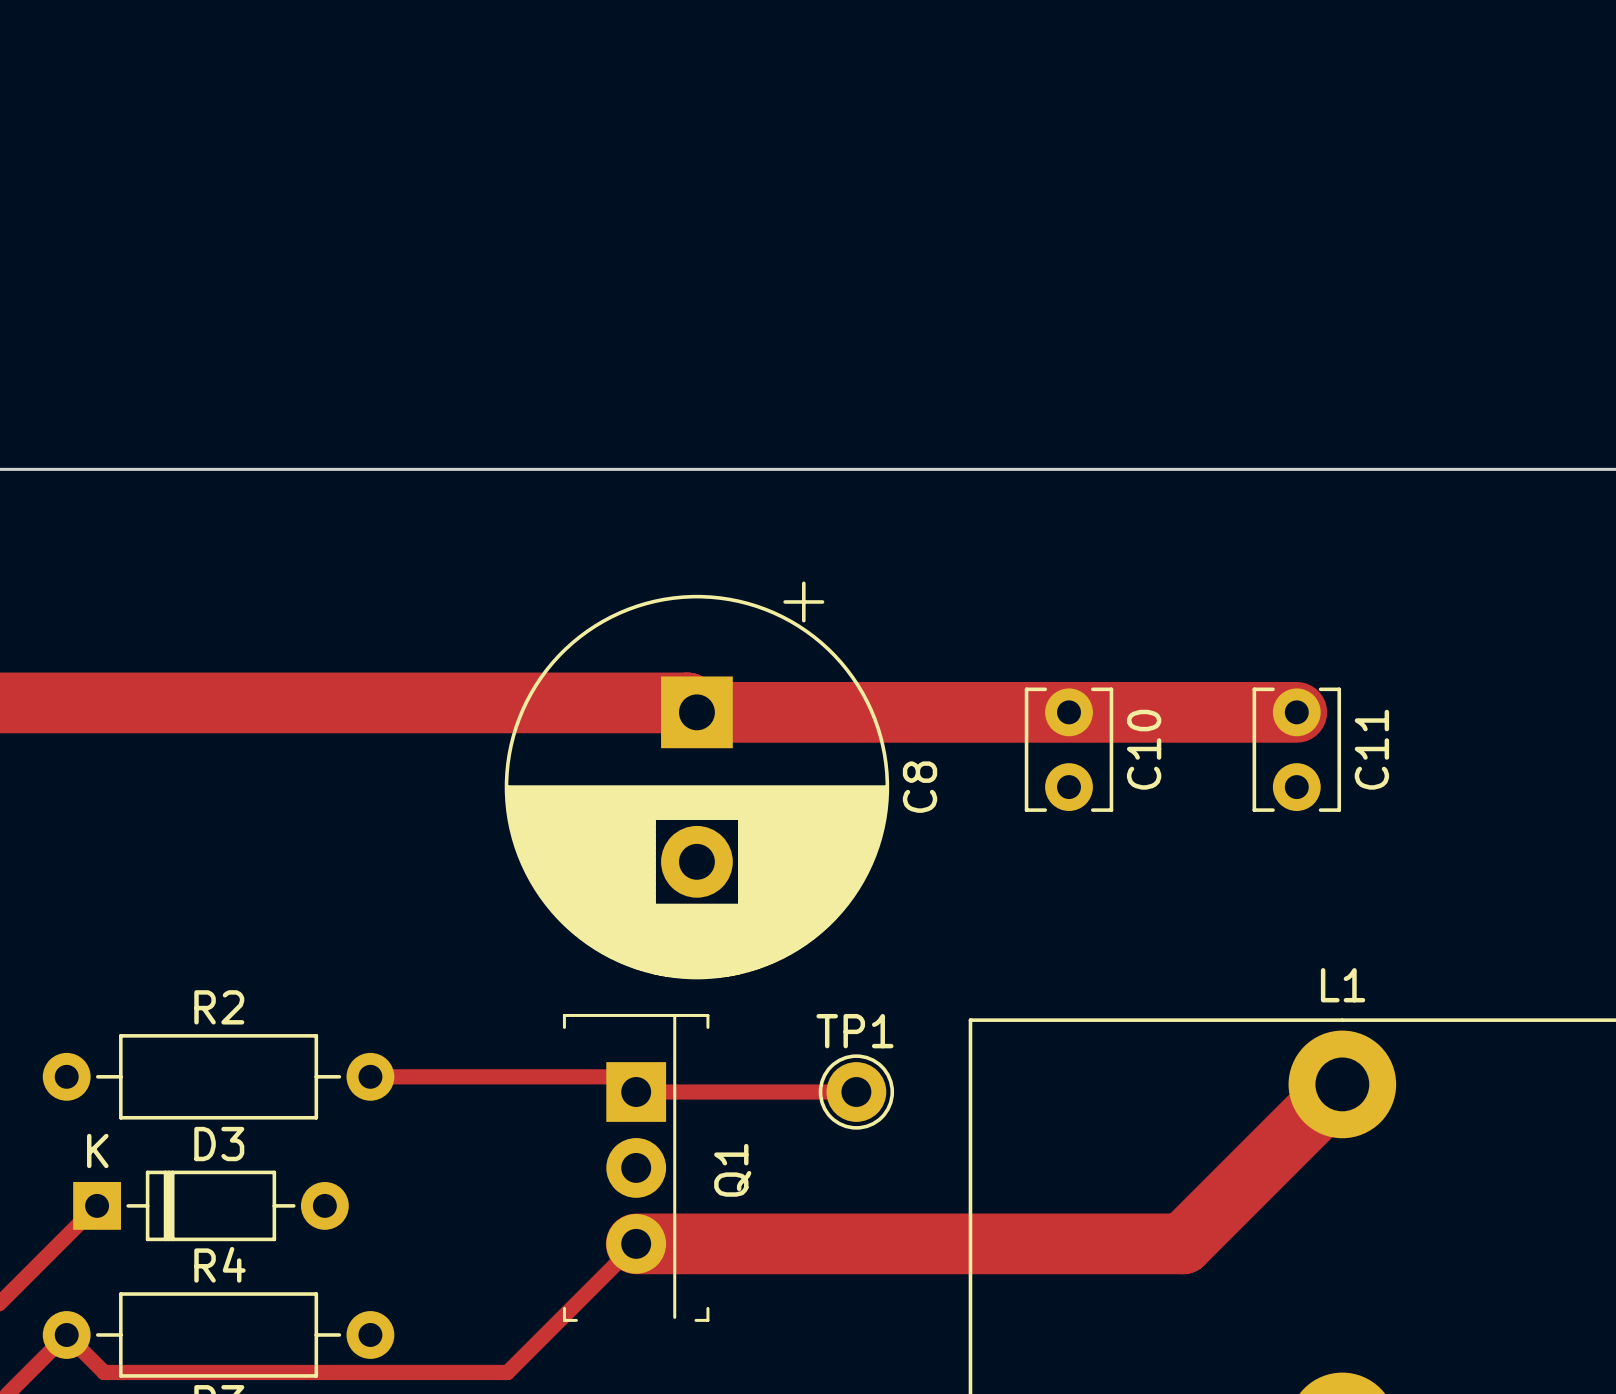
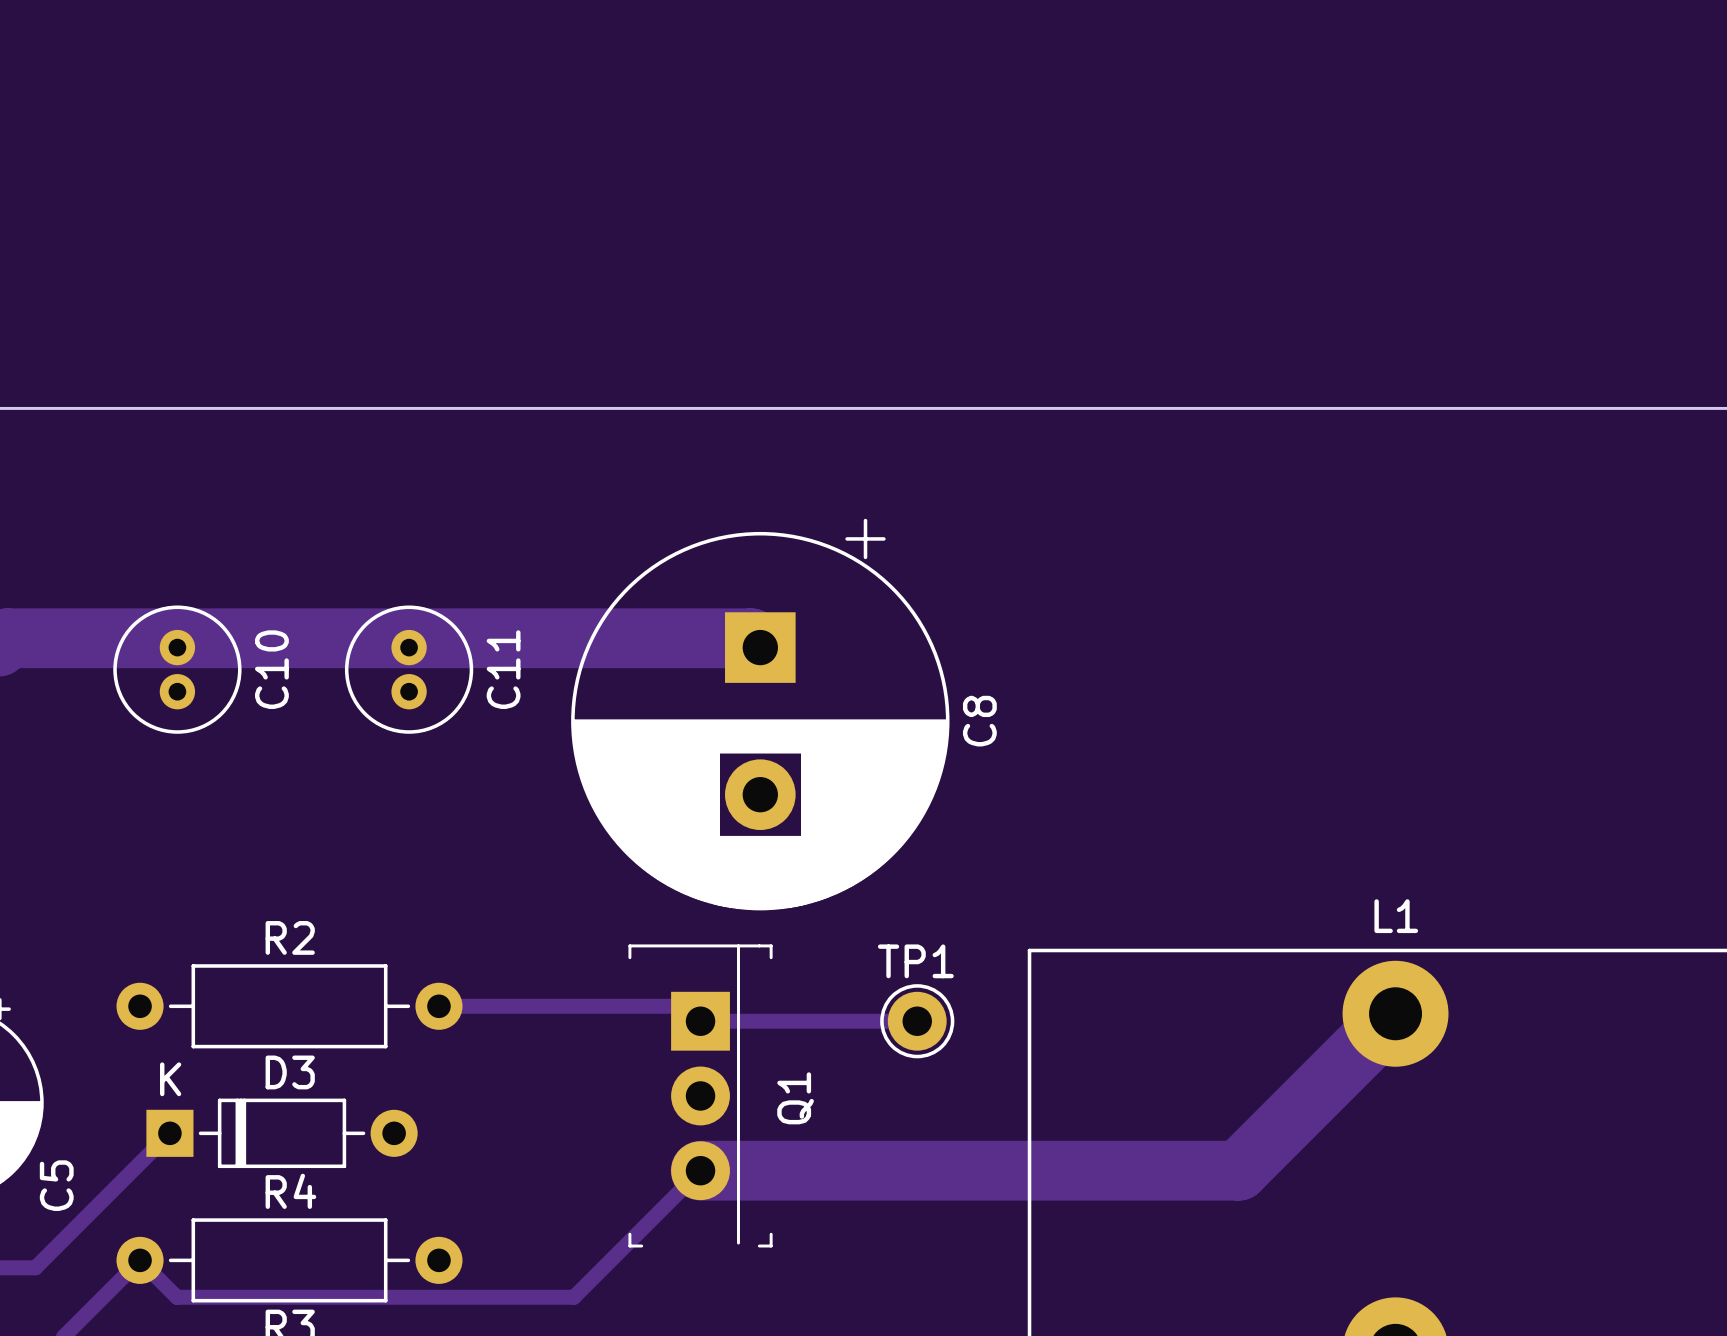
C10 footprint: [1024, 687, 1114, 812] -> [113, 605, 242, 734]
C11 footprint: [1252, 687, 1342, 812] -> [344, 605, 474, 734]
track: (696, 712) (1296, 712) -> none

